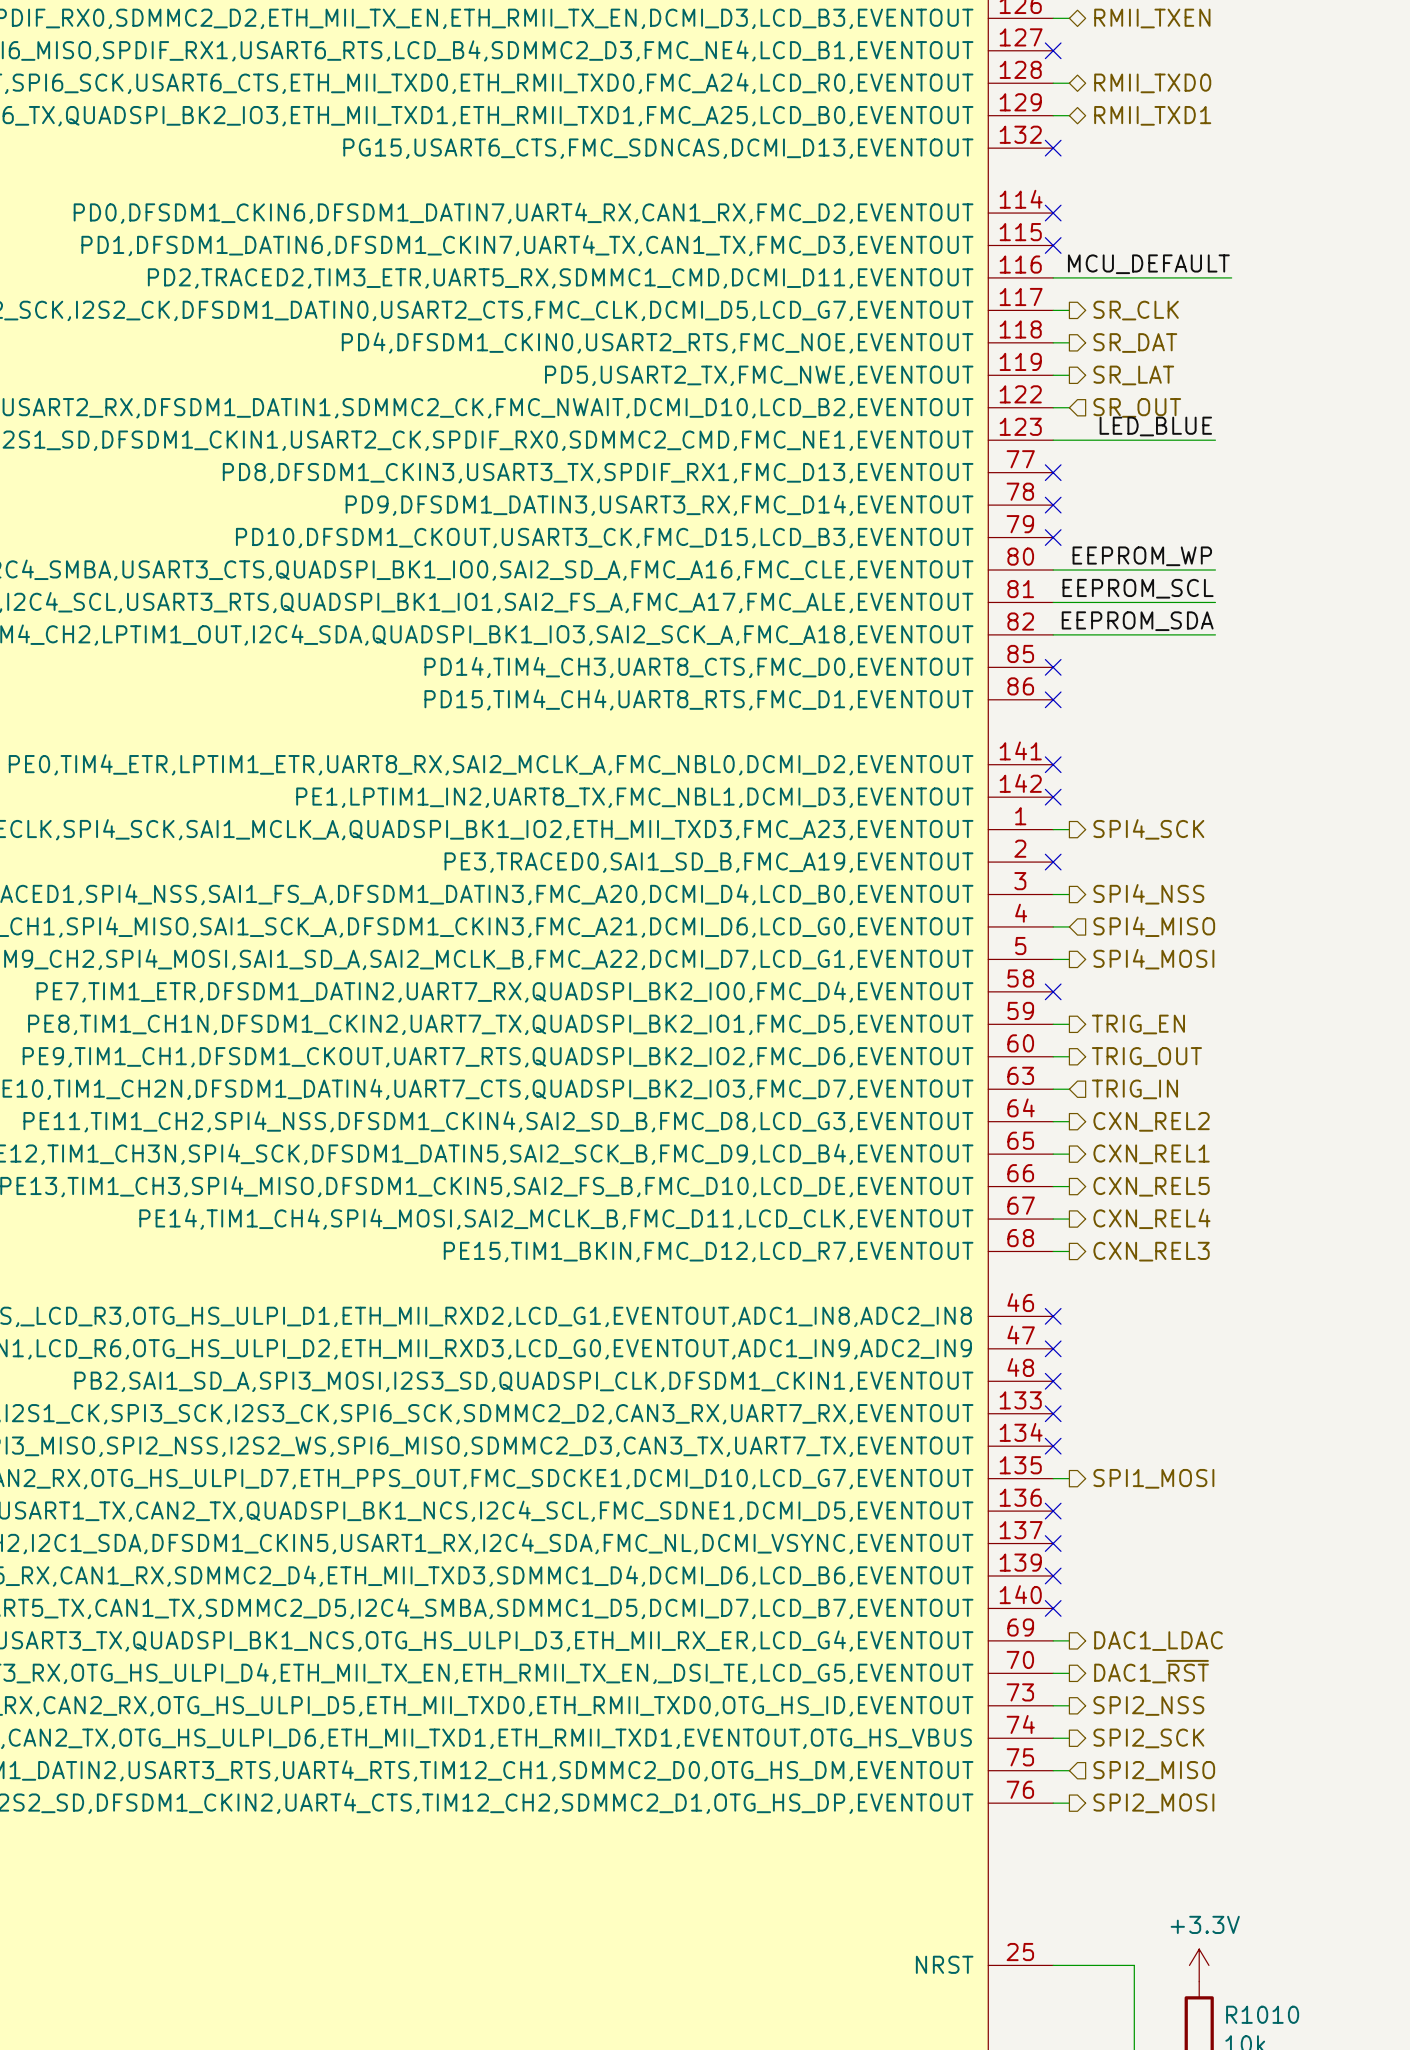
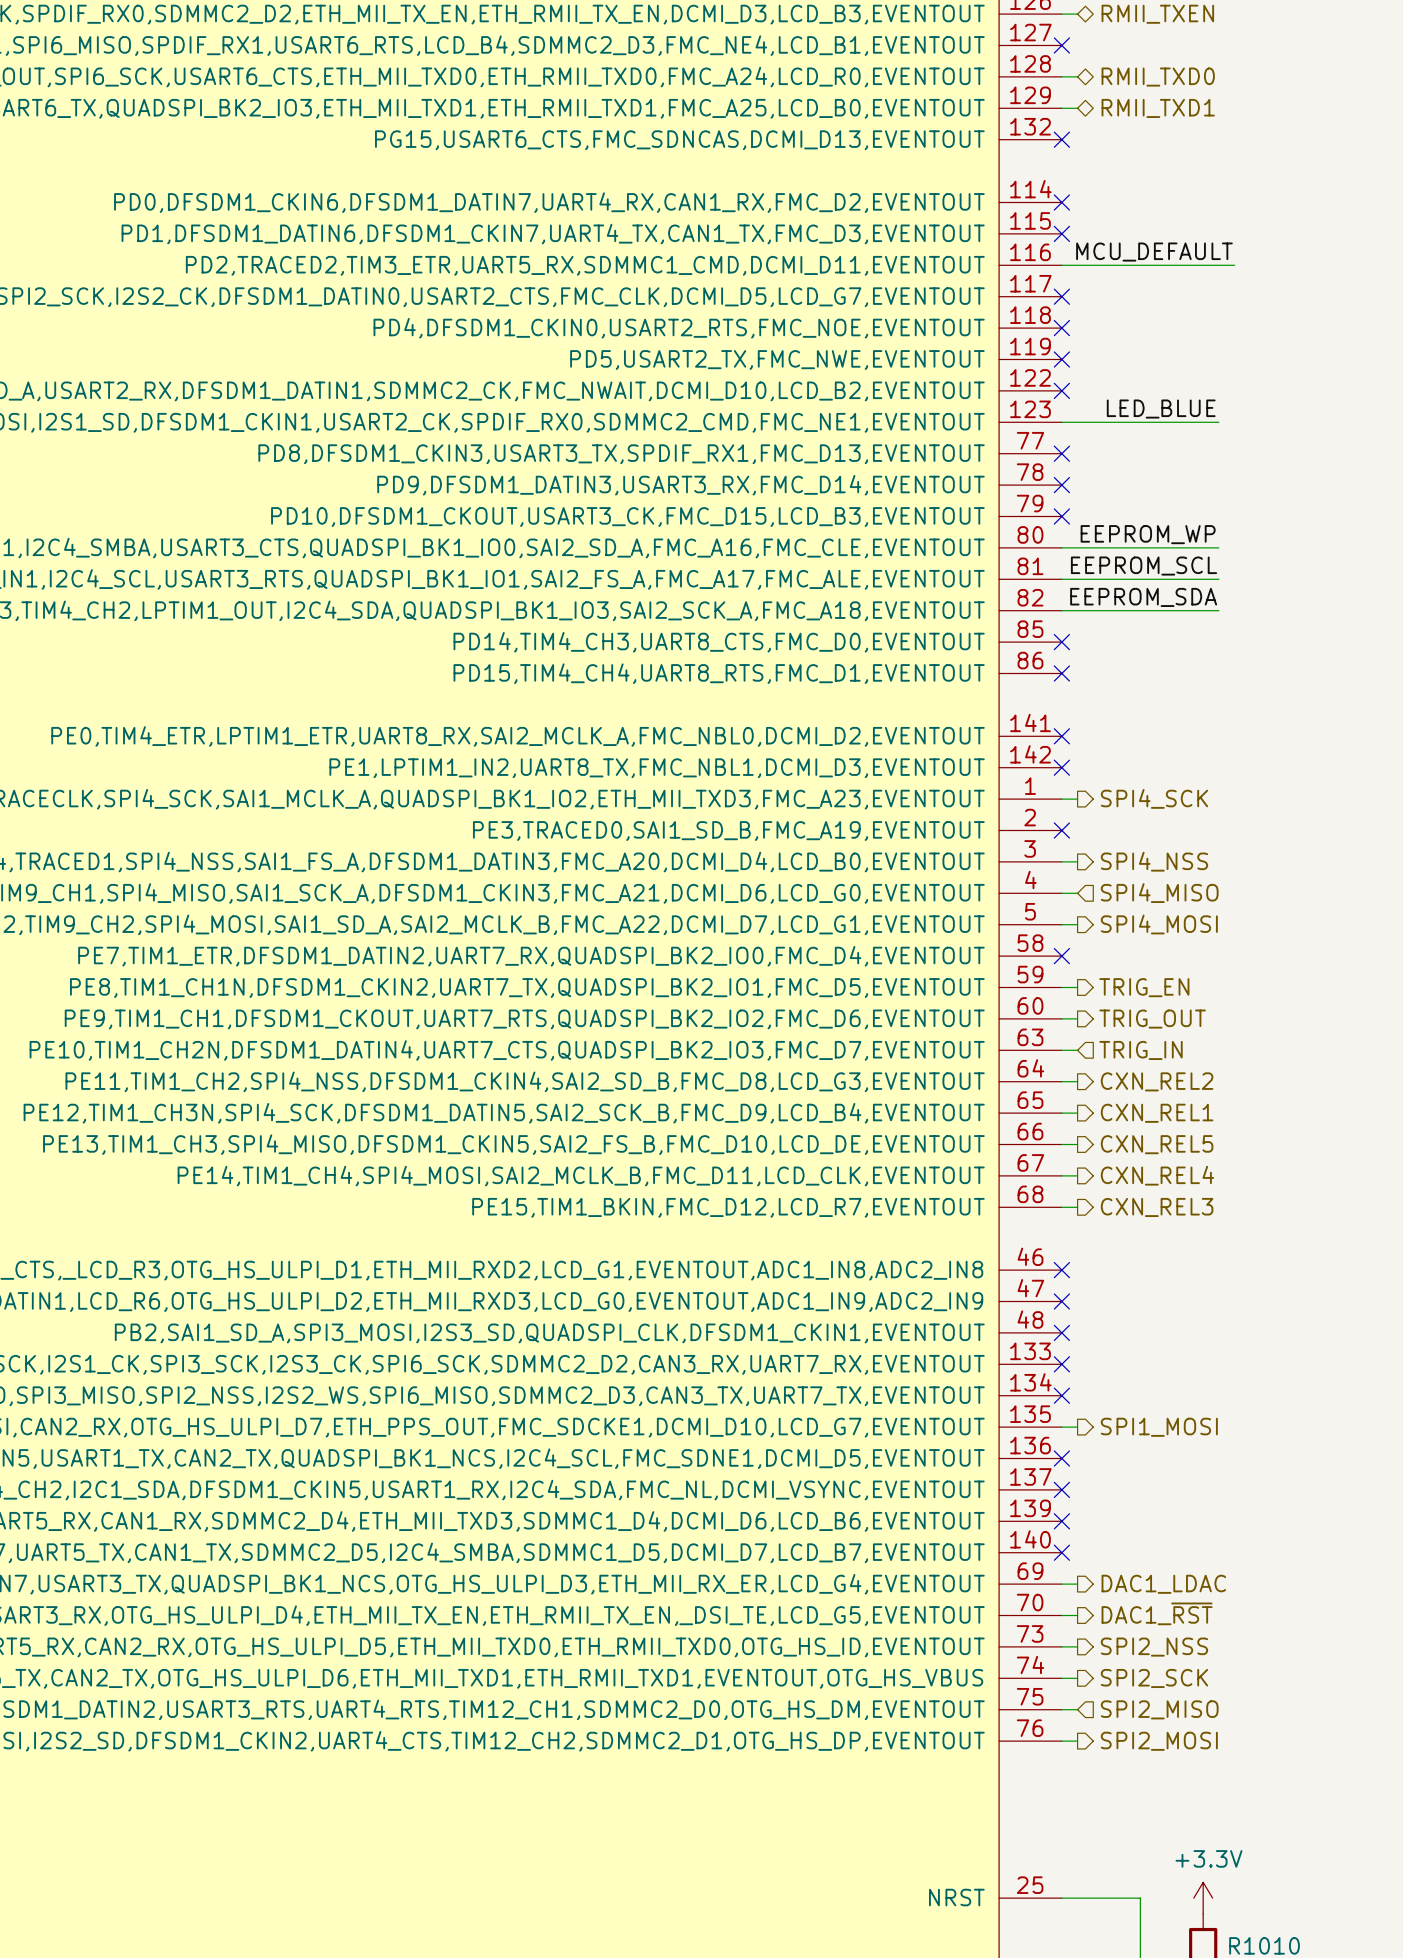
wire: (1053, 310) (1069, 310) -> none
no-connect mark: none -> (1061, 296)
hierarchical label: SR_CLK (1136, 310) -> none
wire: (1053, 342) (1069, 342) -> none
no-connect mark: none -> (1061, 328)
hierarchical label: SR_DAT (1135, 343) -> none
wire: (1053, 375) (1069, 375) -> none
no-connect mark: none -> (1061, 359)
hierarchical label: SR_LAT (1133, 375) -> none
wire: (1053, 407) (1069, 407) -> none
no-connect mark: none -> (1061, 390)
hierarchical label: SR_OUT (1137, 407) -> none

